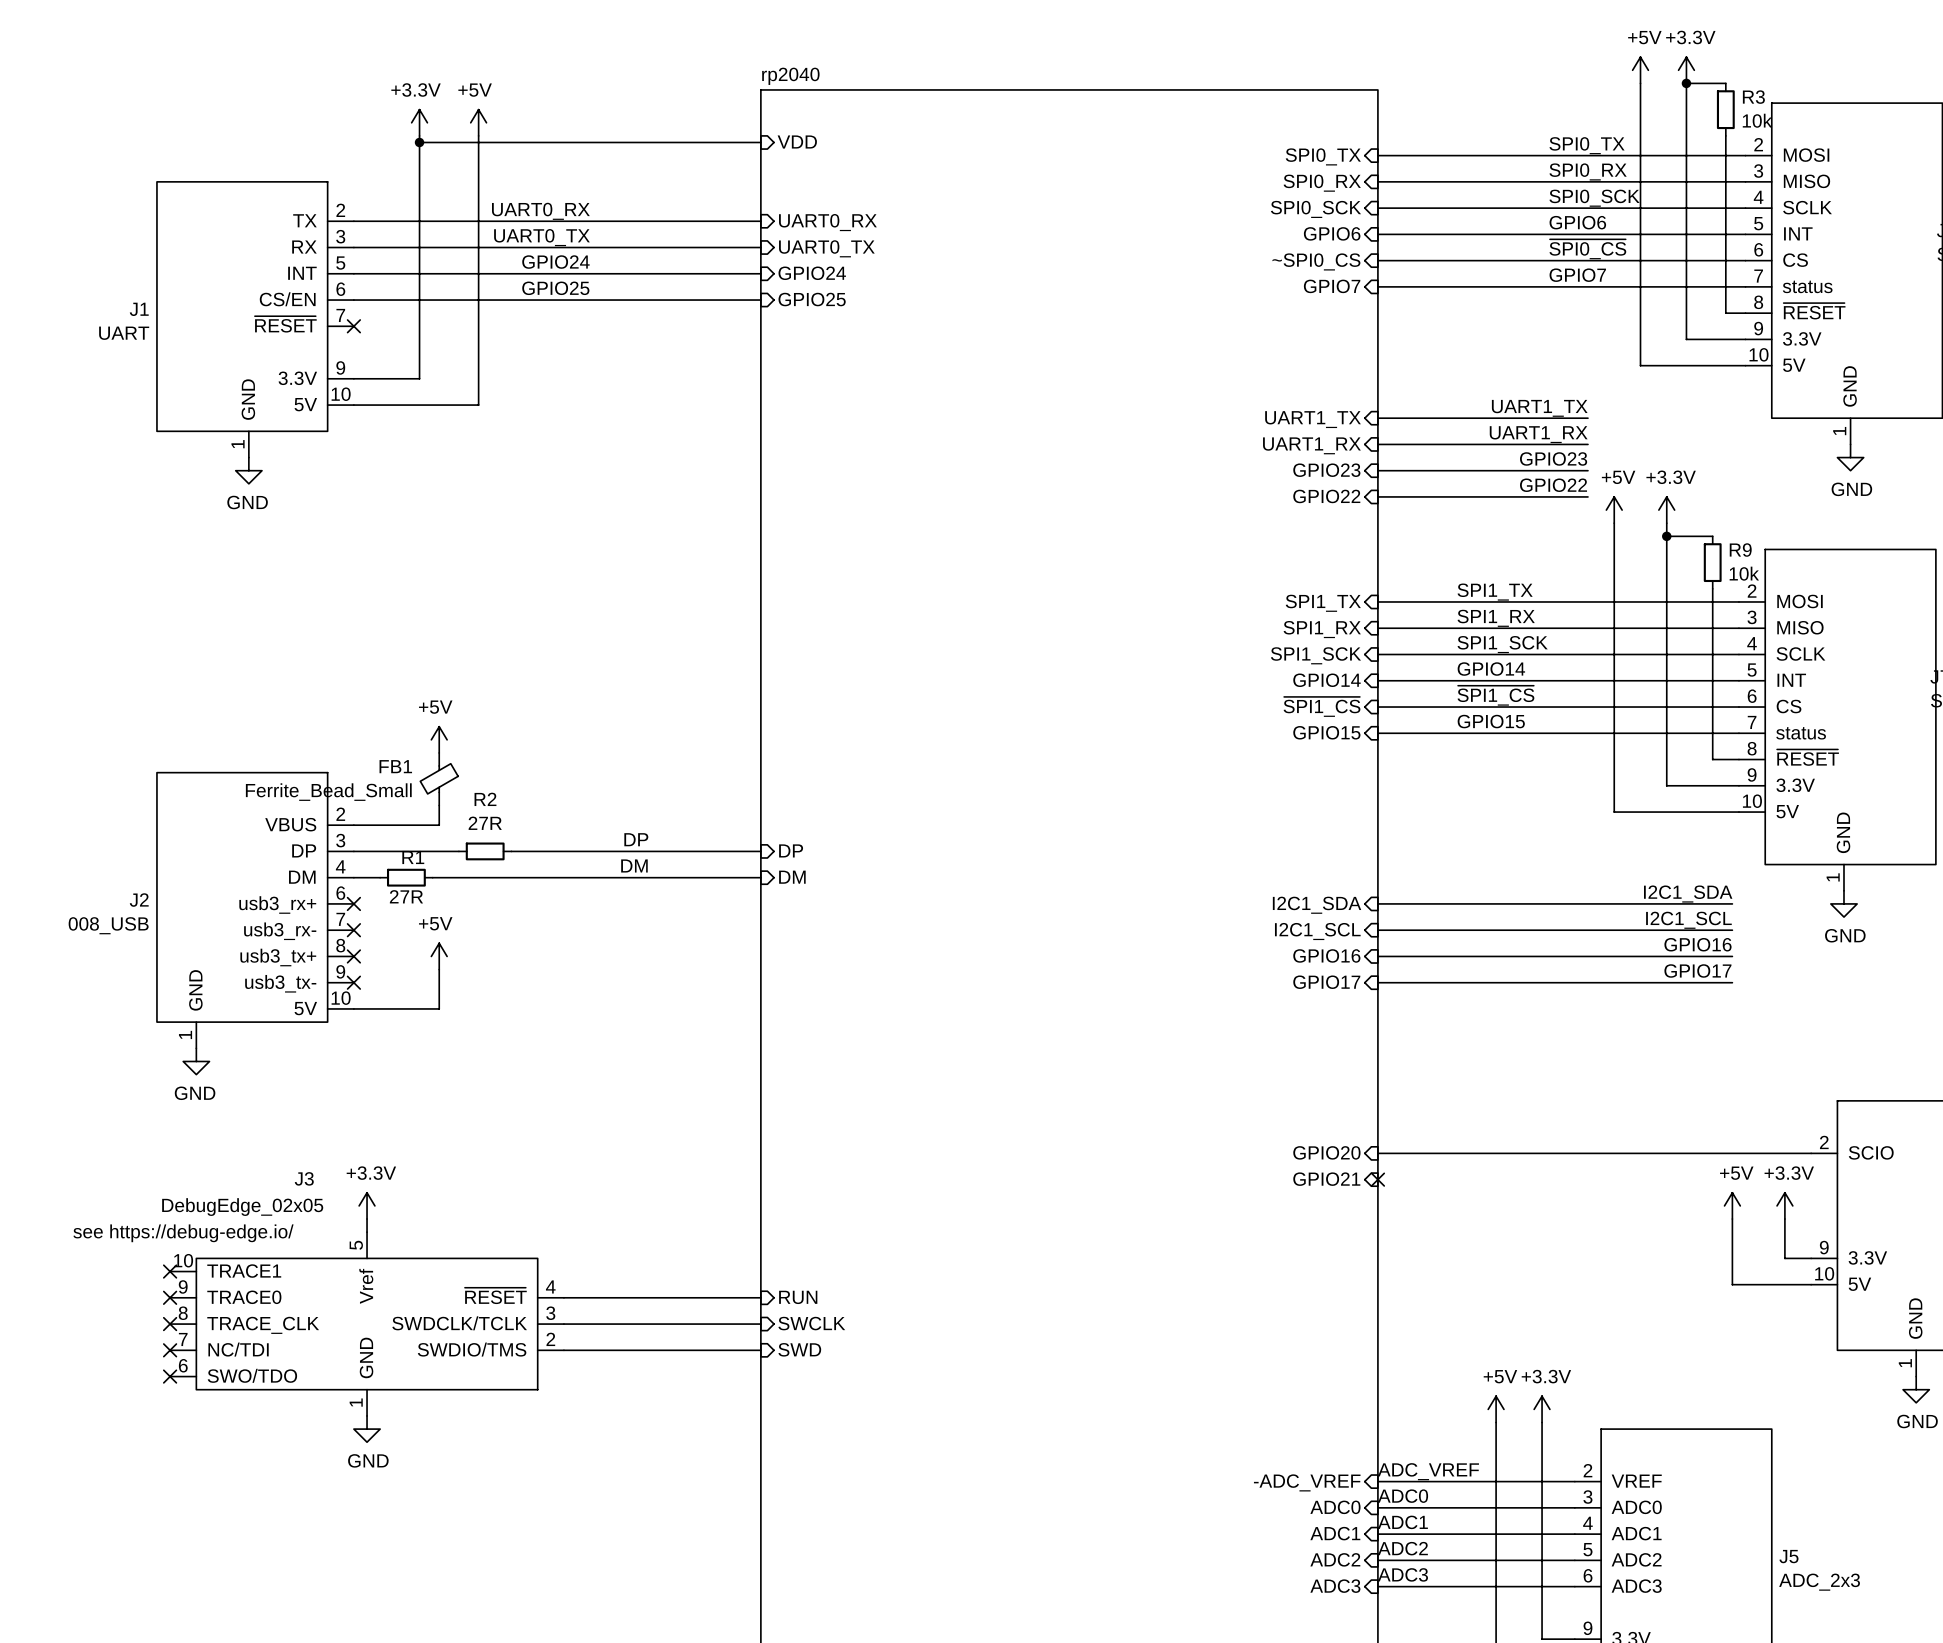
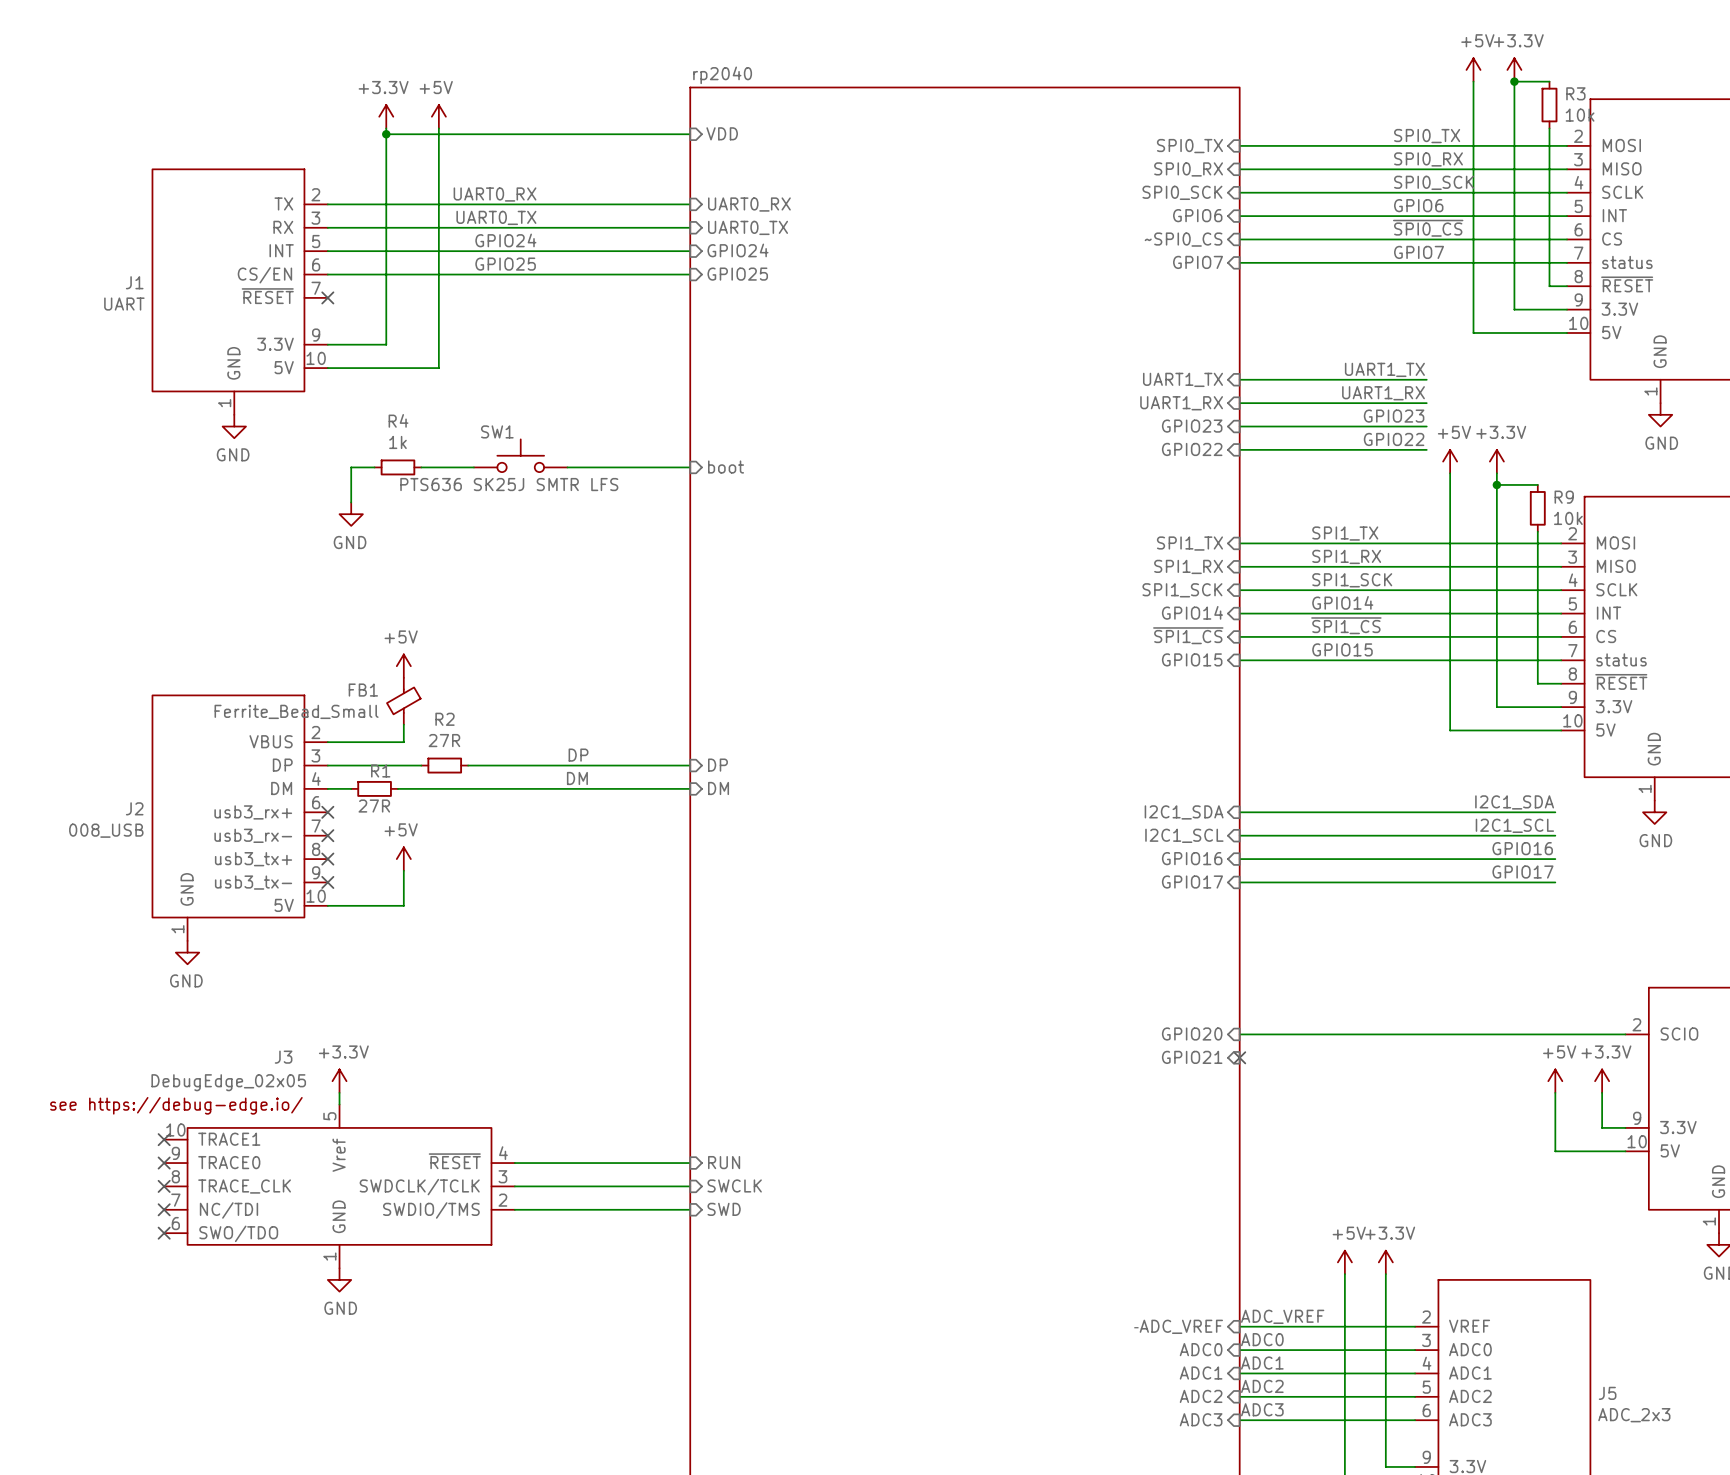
SW1: none -> PTS636 SK25J SMTR LFS (520, 455)
sheet pin: none -> boot (726, 467)
wire: none -> (374, 467) (351, 467) (351, 502)
R4: none -> 1k (397, 467)
wire: none -> (421, 467) (473, 467)
wire: none -> (567, 467) (690, 467)
power symbol: none -> GND (351, 514)

